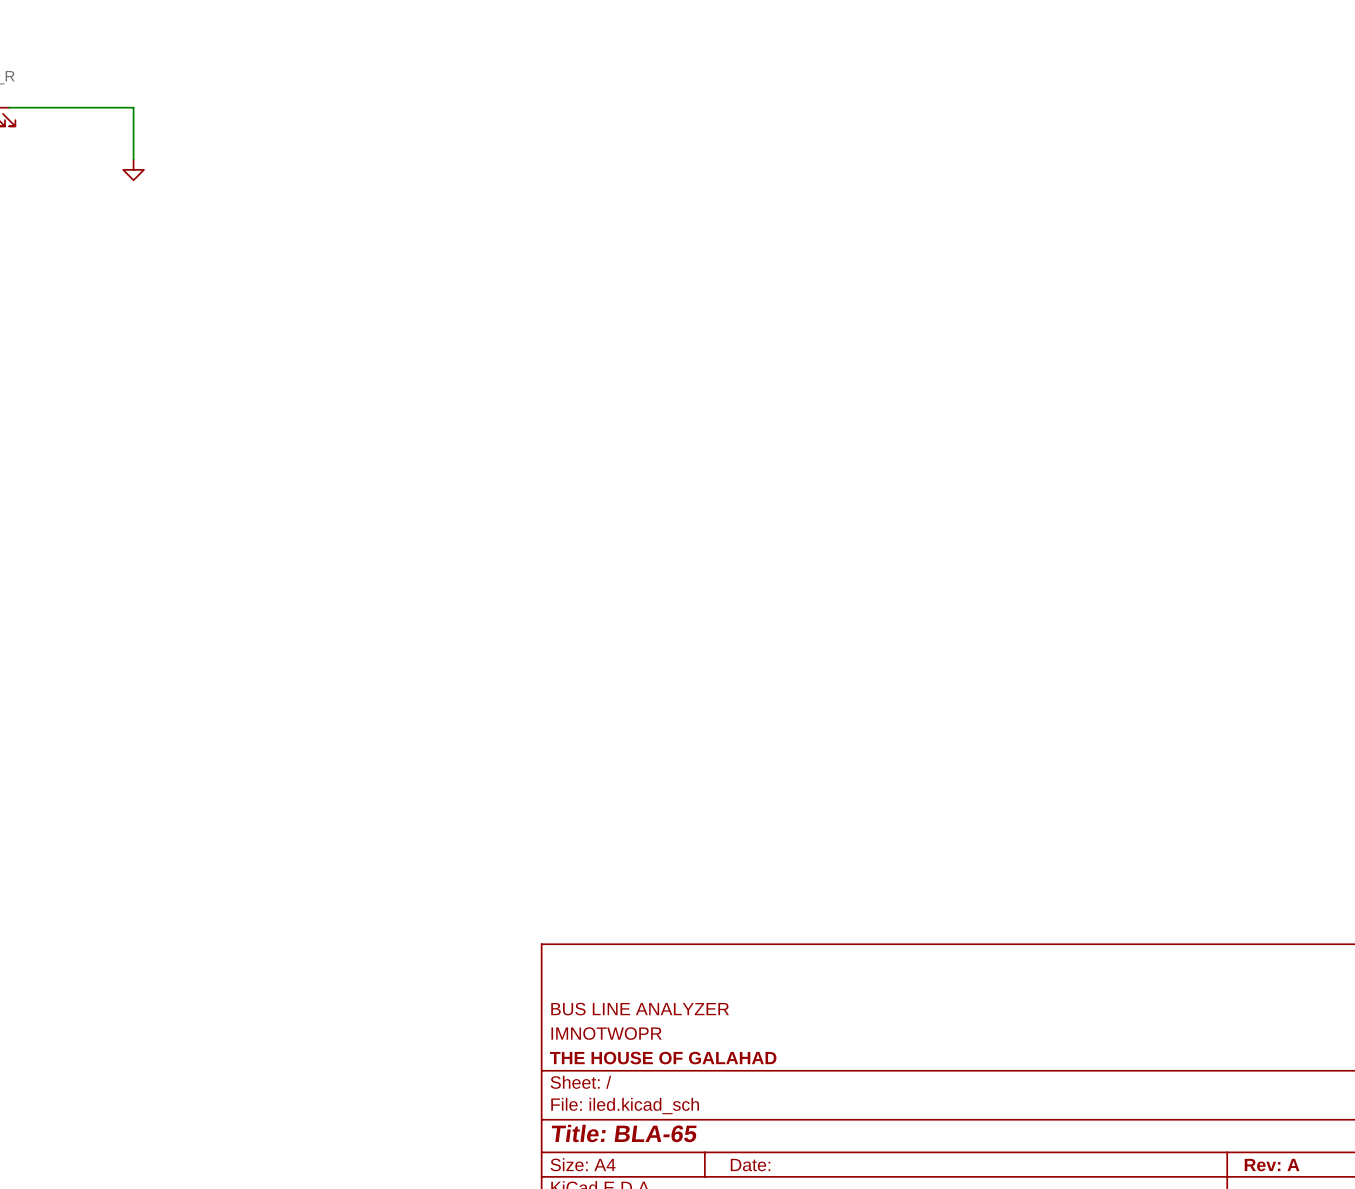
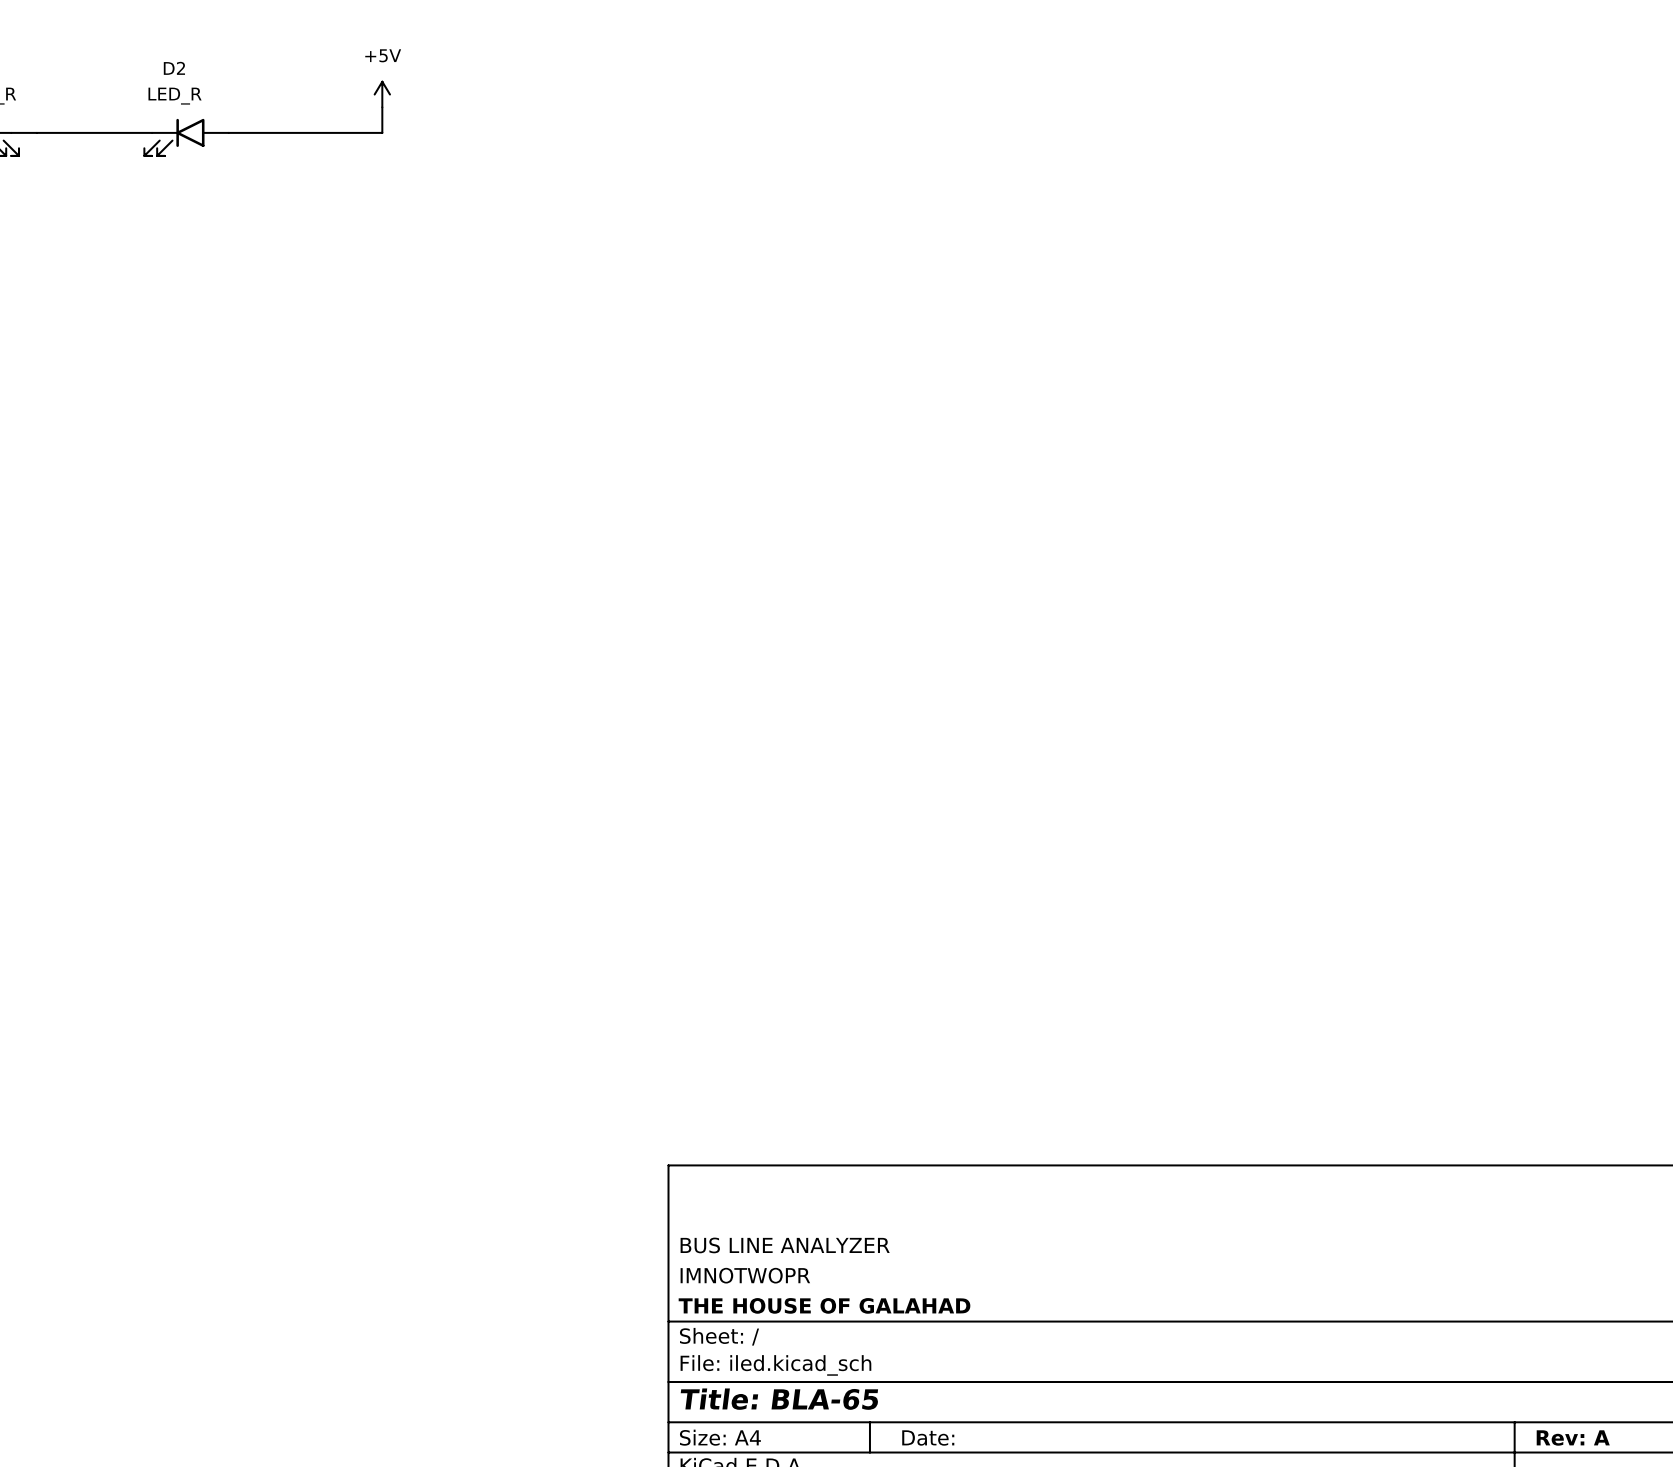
power symbol: none -> +5V (382, 94)
wire: none -> (382, 107) (382, 132) (228, 132)
wire: (123, 107) (133, 107) (133, 159) -> none
D2: none -> LED_R (186, 137)
power symbol: (133, 169) -> none

